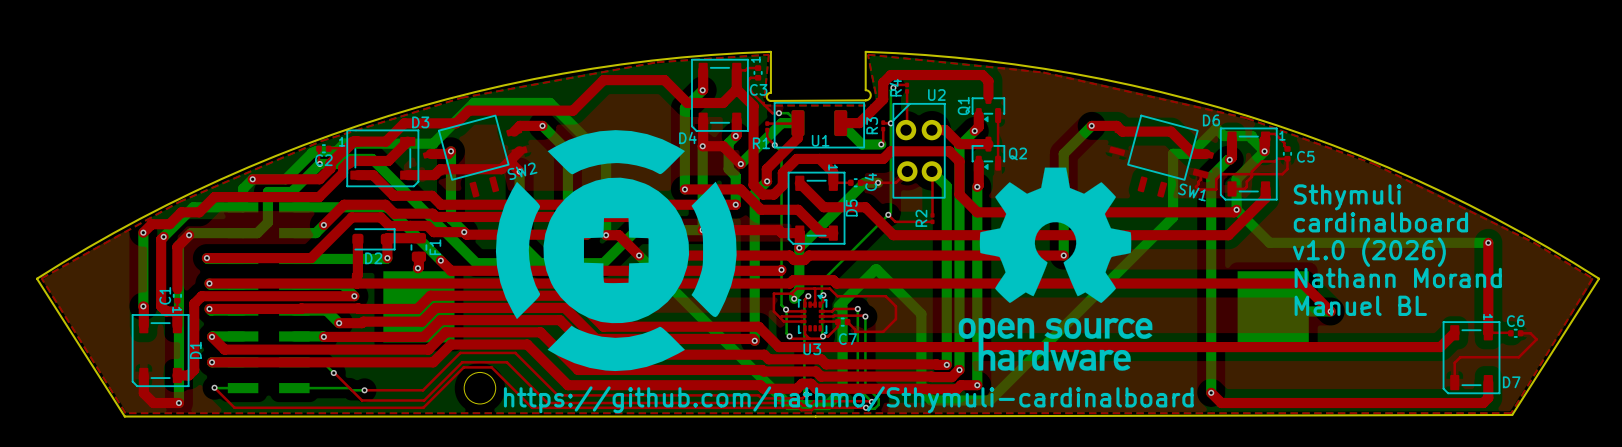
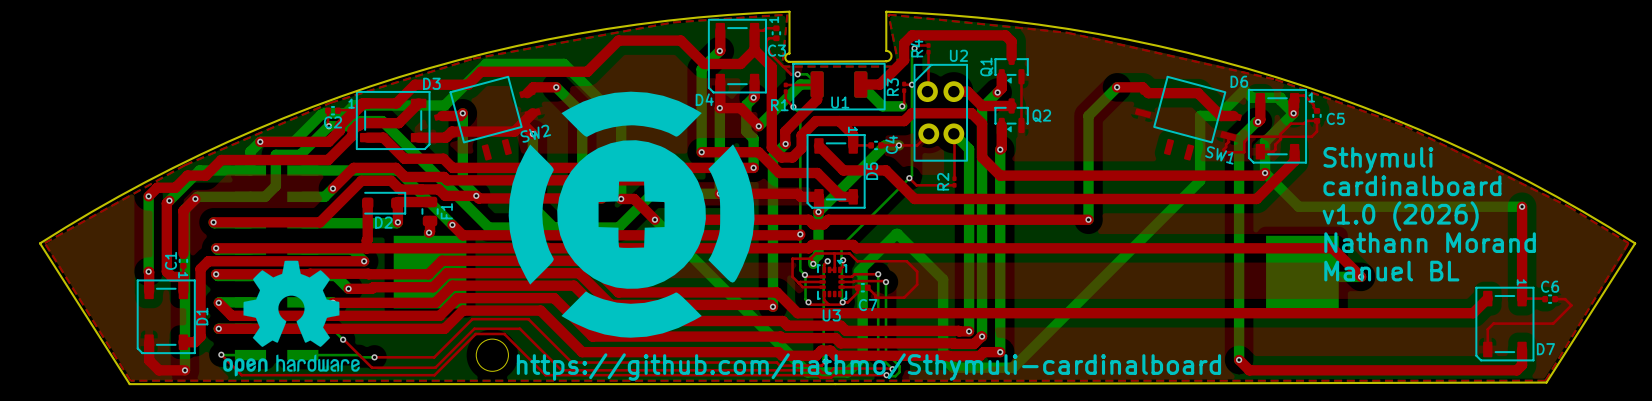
drawing: [958, 167, 1153, 371] -> none
drawing: none -> [223, 260, 360, 377]

